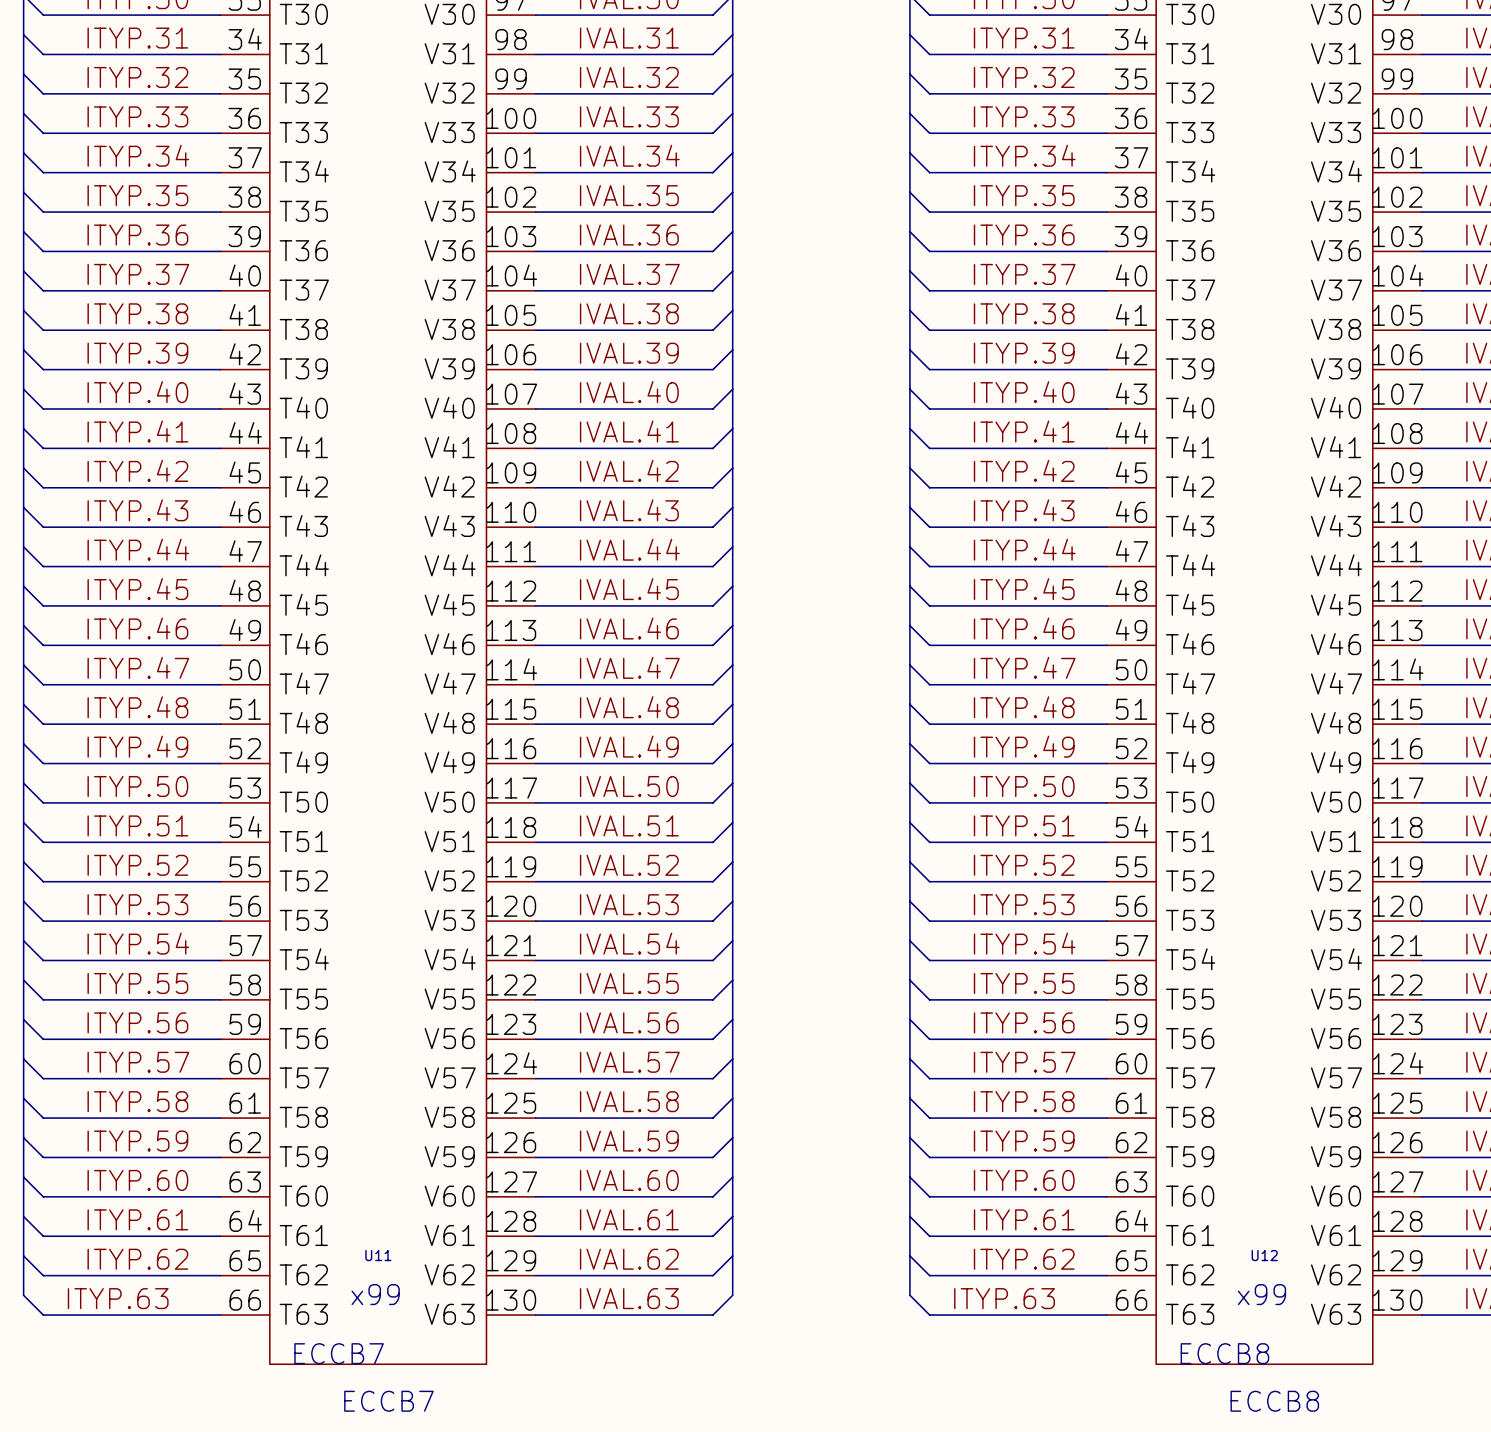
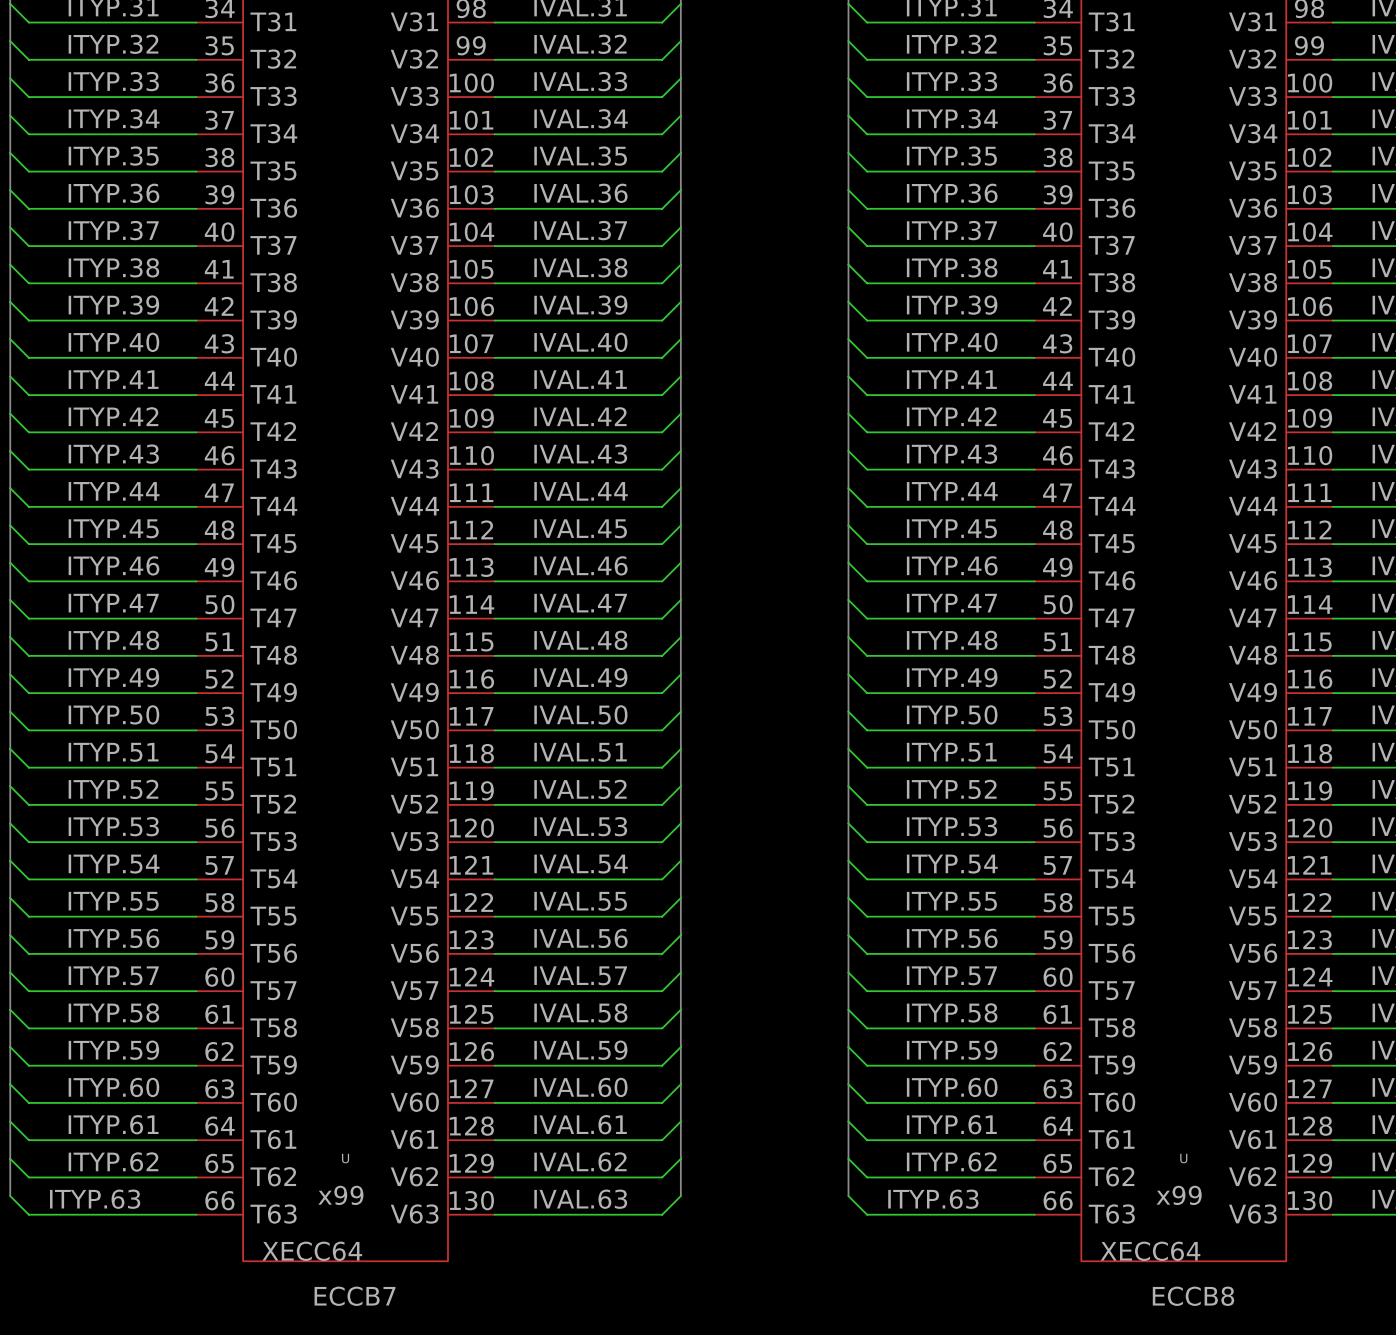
U11 name: U11 (378, 1255) -> U (345, 1158)
U12 name: U12 (1264, 1255) -> U (1183, 1158)
U11 value: ECCB7 (339, 1353) -> XECC64 (312, 1251)
U12 value: ECCB8 (1224, 1353) -> XECC64 (1150, 1251)

